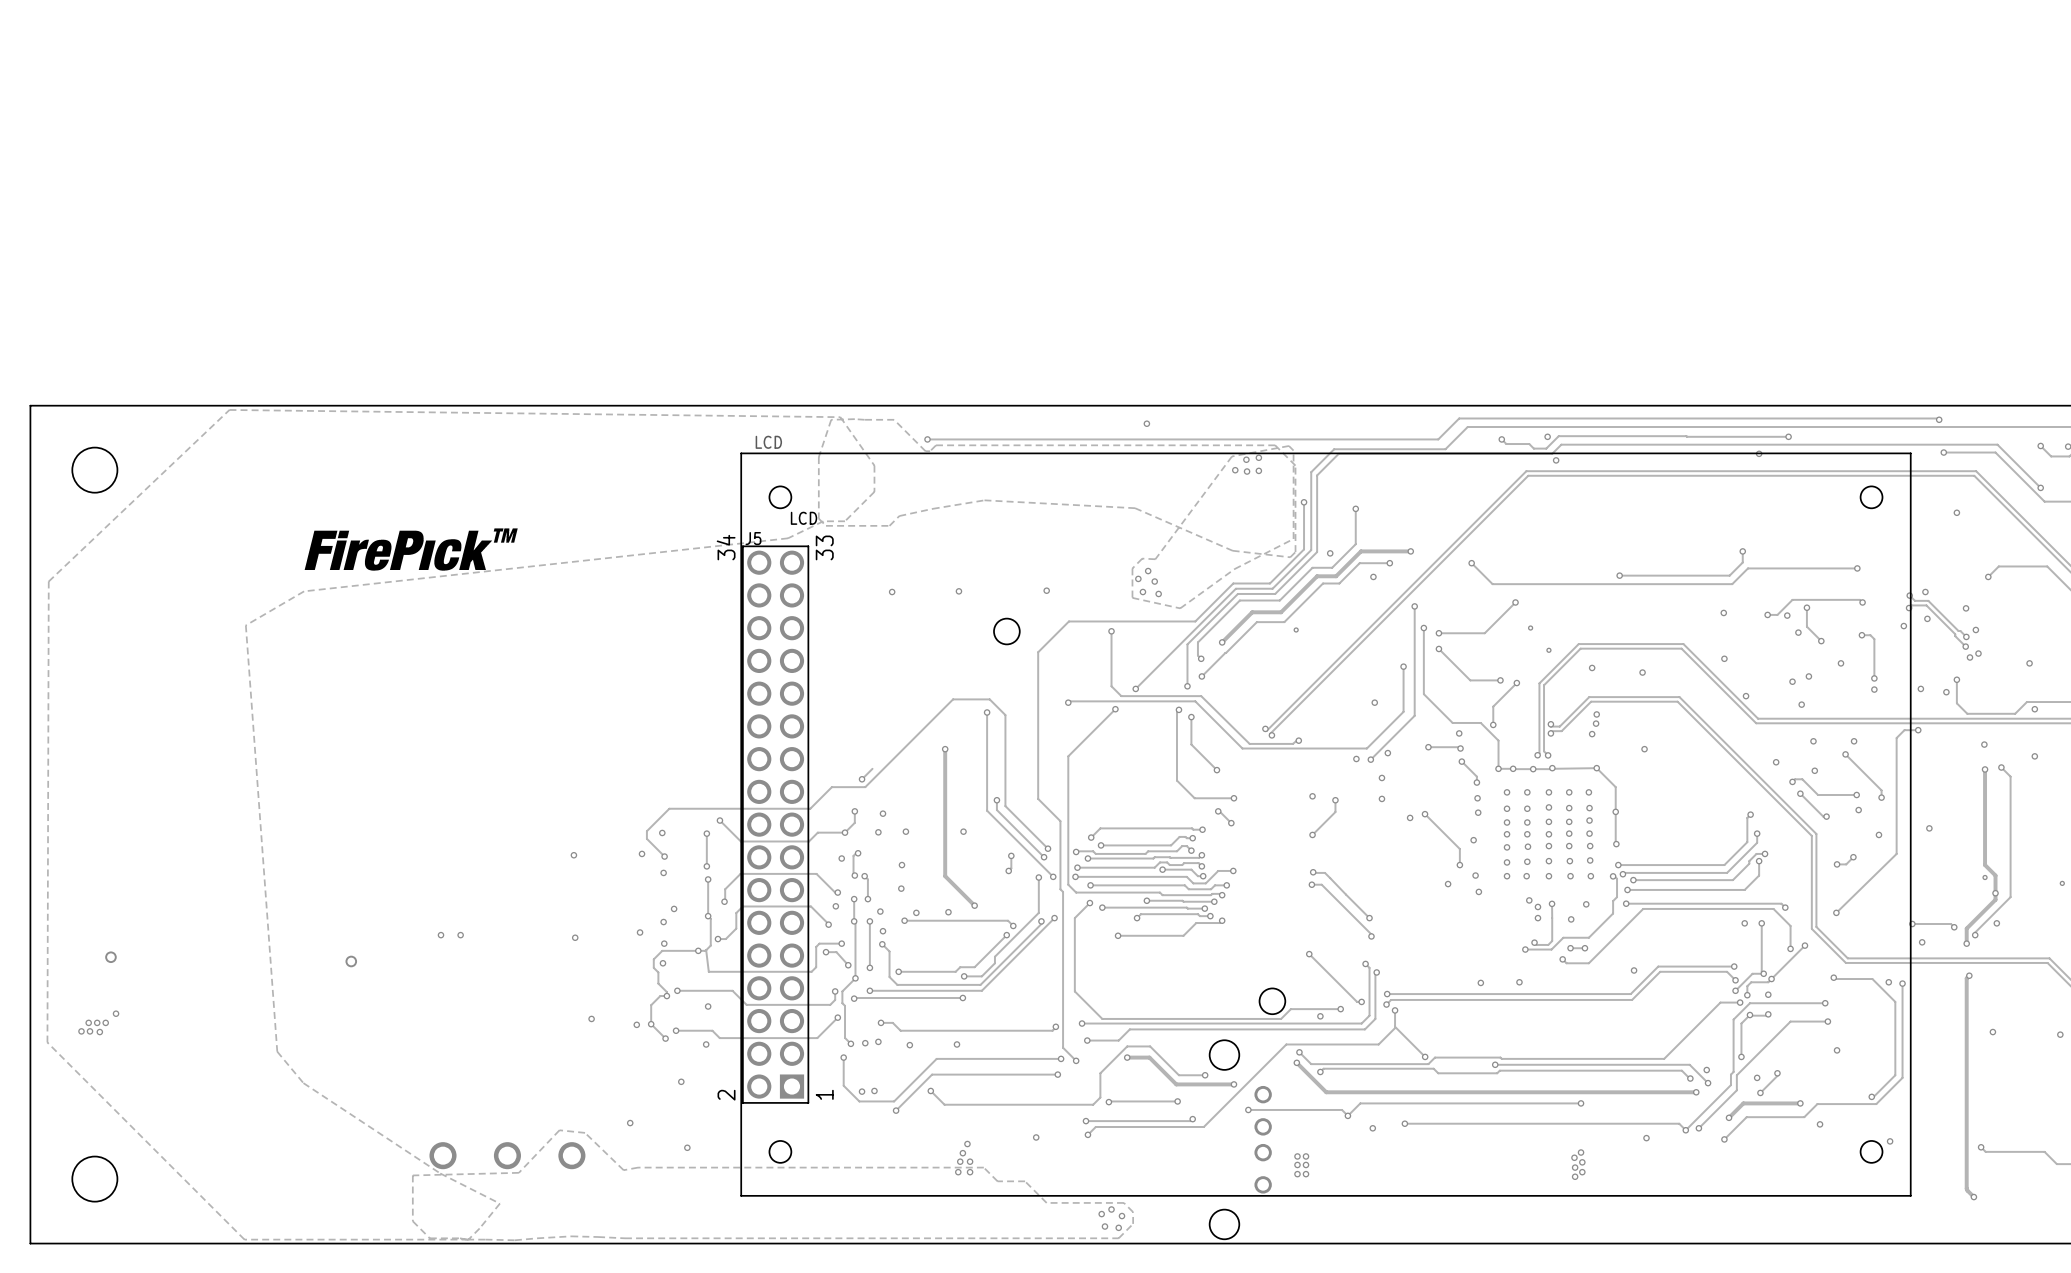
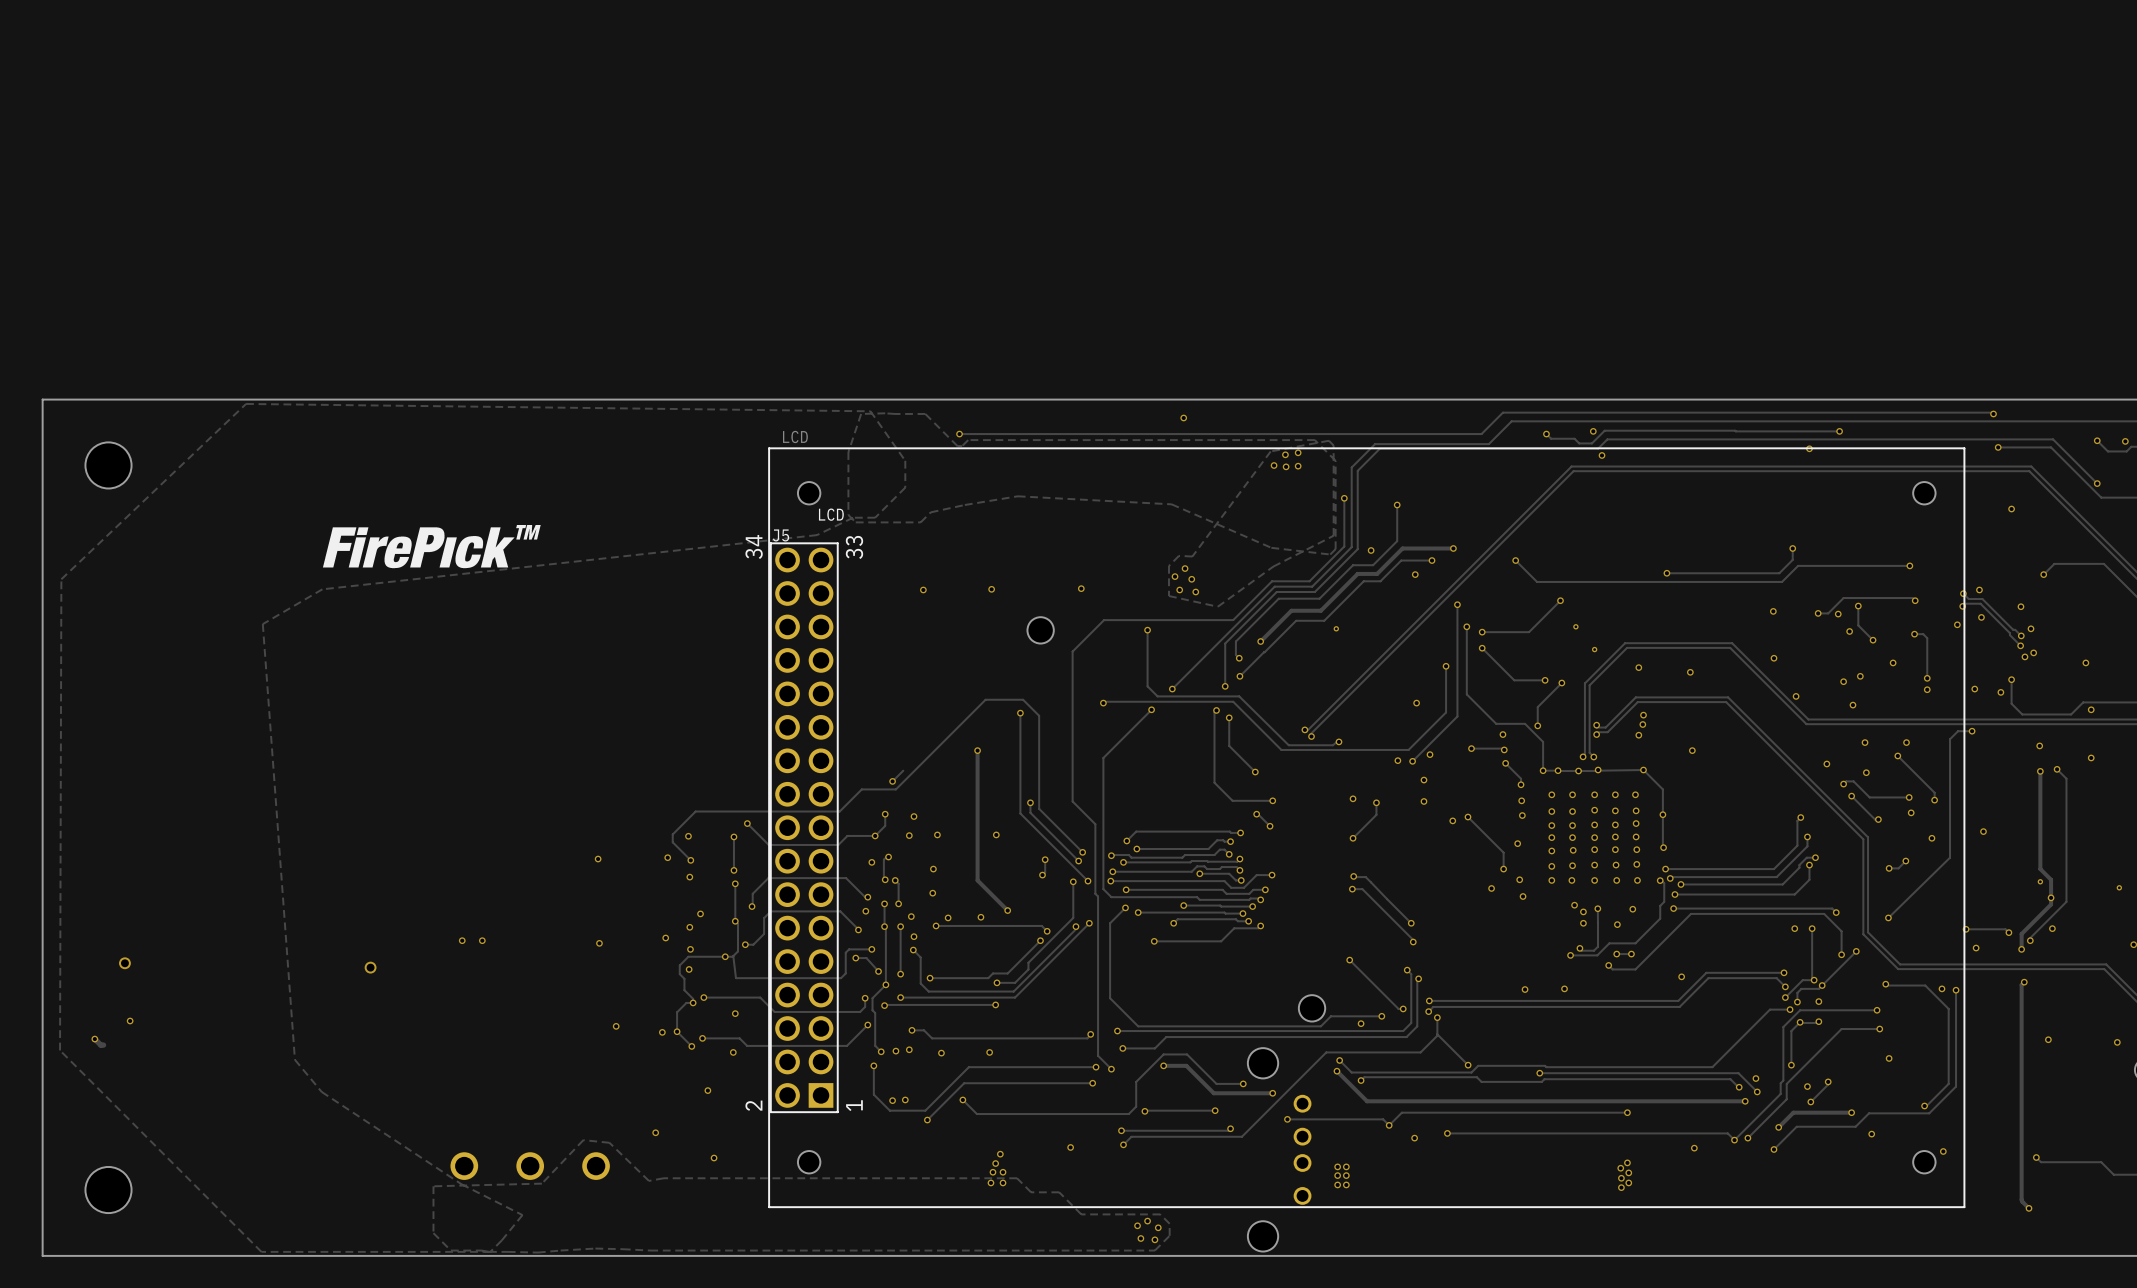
via: (88, 1022) -> none
via: (97, 1022) -> none
via: (105, 1022) -> none
track: none -> (94, 1039) (100, 1045) (103, 1045)
via: (90, 1031) -> none
via: (99, 1032) -> none

